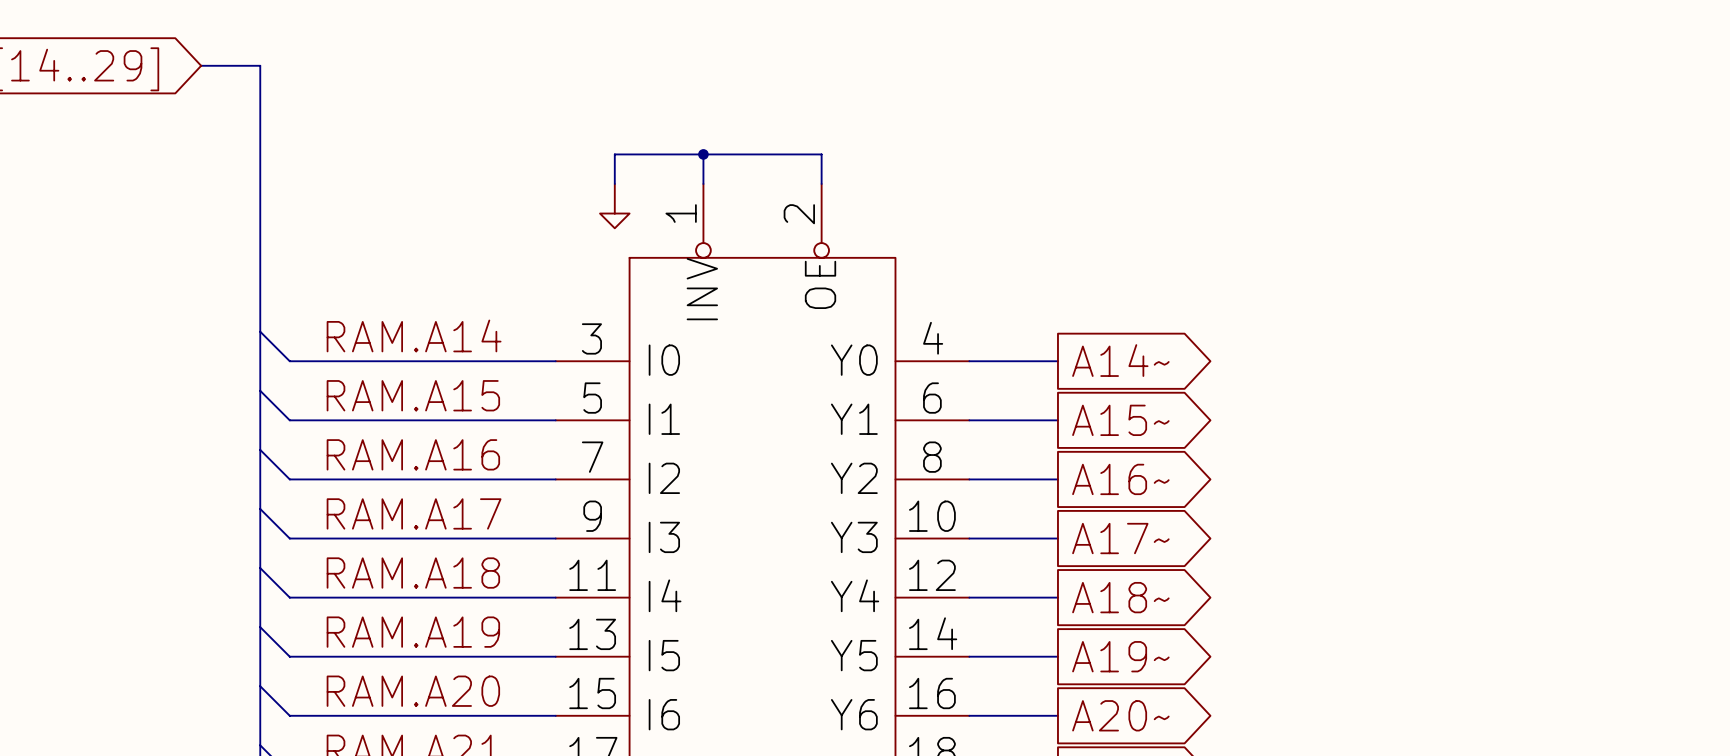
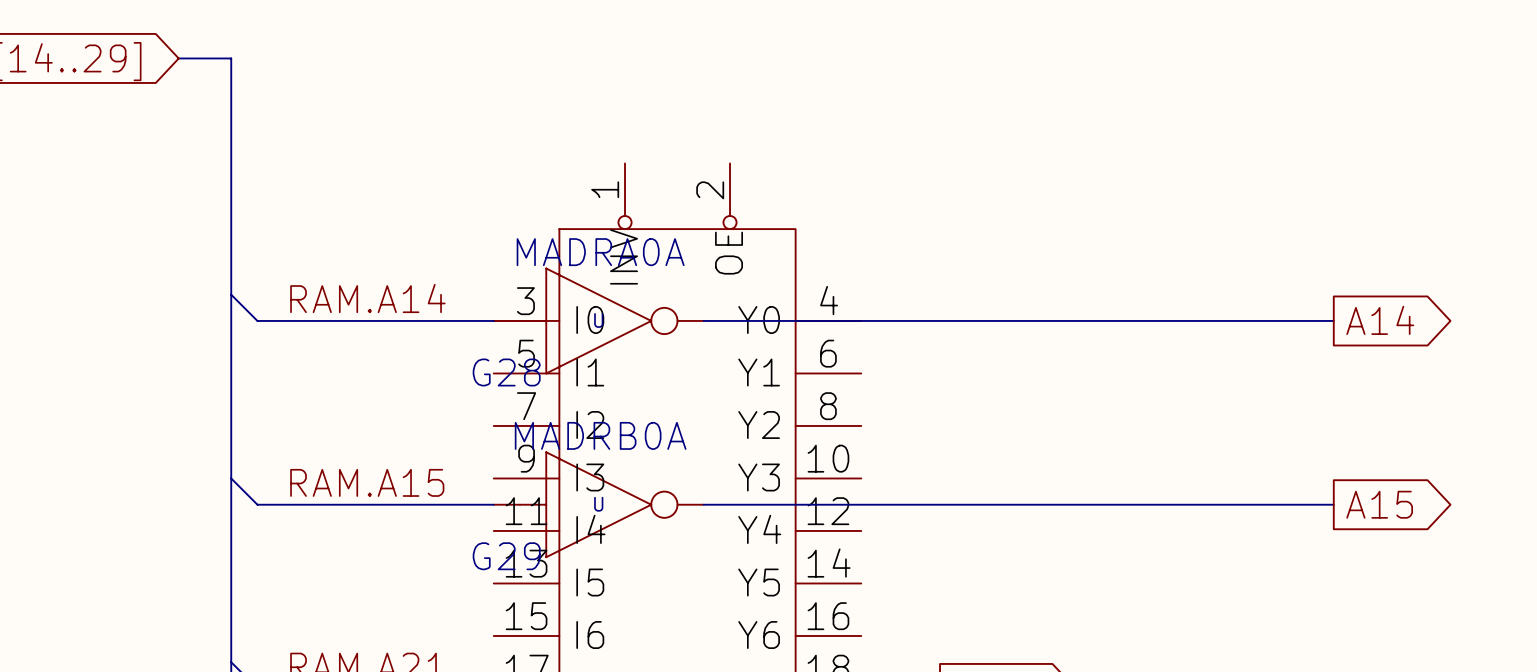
wire: (703, 154) (703, 183) -> none
junction: (703, 154) -> none
wire: (614, 183) (614, 154) (821, 154) (821, 183) -> none
power symbol: (614, 206) -> none
global label: A14~ (1120, 360) -> none
global label: none -> A14 (1380, 320)
U: none -> (598, 320)
wire: none -> (703, 320) (861, 320)
wire: none -> (940, 320) (1333, 320)
wire: (260, 390) (289, 420) (555, 420) -> none
label position: RAM.A15 (413, 395) -> RAM.A15 (367, 482)
wire: (969, 420) (1057, 420) -> none
global label: A15~ (1120, 420) -> none
wire: (260, 449) (289, 479) (555, 479) -> none
label: RAM.A16 (413, 454) -> none
wire: (969, 479) (1057, 479) -> none
global label: A16~ (1120, 479) -> none
wire: (260, 508) (289, 538) (555, 538) -> (231, 478) (257, 504) (493, 504)
label: RAM.A17 (414, 513) -> none
wire: (969, 538) (1057, 538) -> none
global label: A17~ (1120, 538) -> none
wire: (260, 568) (289, 597) (555, 597) -> none
U: none -> (598, 504)
wire: none -> (703, 504) (1333, 504)
global label: none -> A15 (1379, 504)
label: RAM.A18 (413, 573) -> none
wire: (969, 597) (1057, 597) -> none
global label: A18~ (1120, 597) -> none
wire: (260, 627) (289, 656) (555, 656) -> none
label: RAM.A19 (413, 632) -> none
wire: (969, 656) (1057, 656) -> none
global label: A19~ (1120, 656) -> none
wire: (260, 686) (289, 715) (555, 715) -> none
label: RAM.A20 (413, 691) -> none
wire: (969, 715) (1057, 715) -> none
global label: A20~ (1120, 715) -> none

